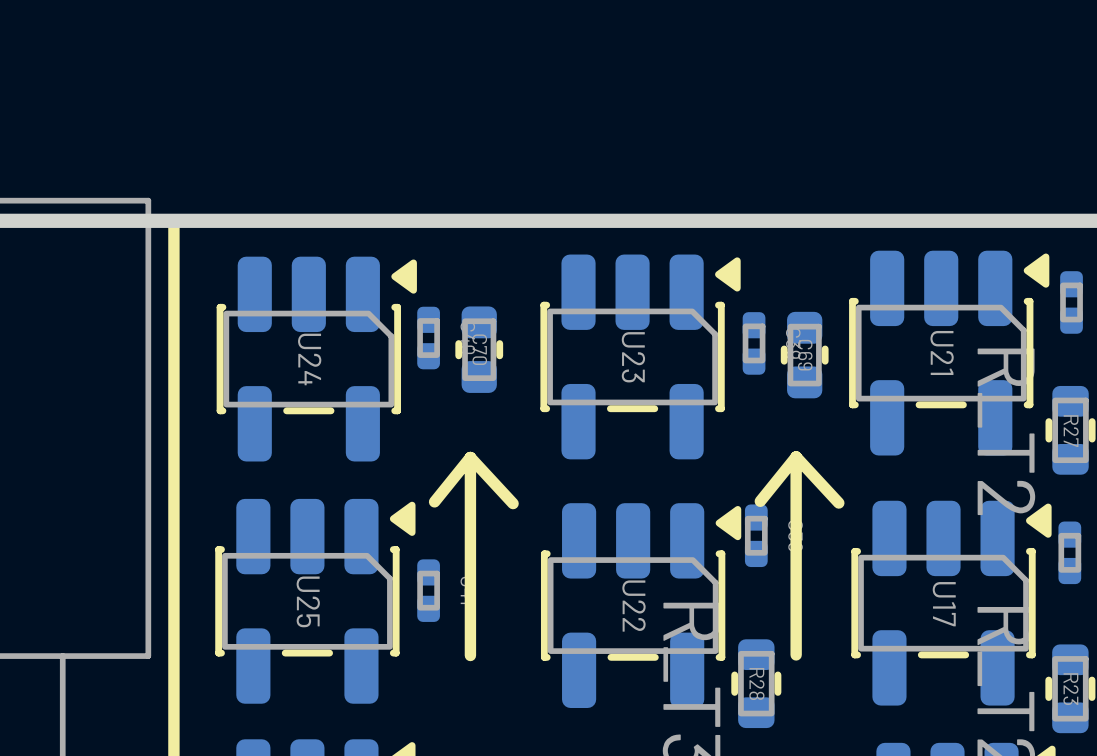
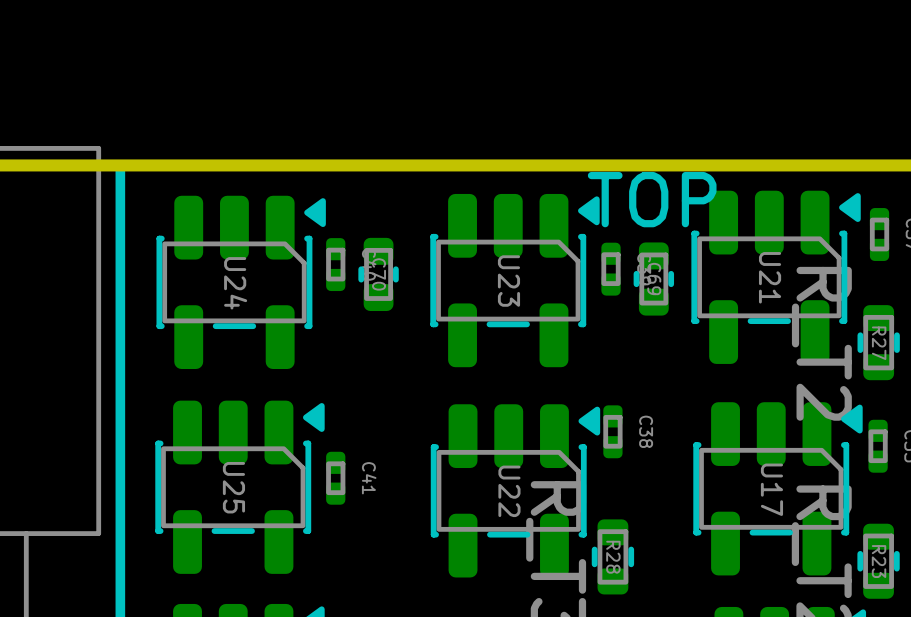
text: none -> TOP (652, 199)
line: (796, 456) (838, 503) -> none
line: (796, 456) (760, 501) -> none
line: (796, 456) (796, 654) -> none
line: (470, 457) (513, 503) -> none
line: (470, 457) (434, 501) -> none
line: (470, 457) (470, 655) -> none

